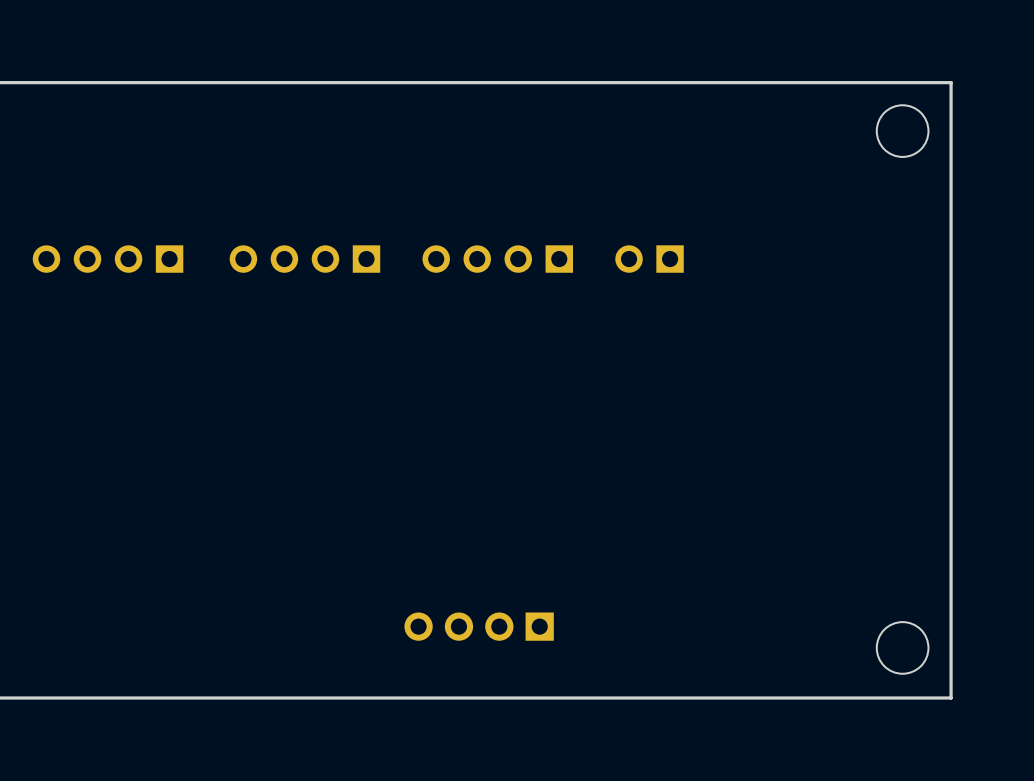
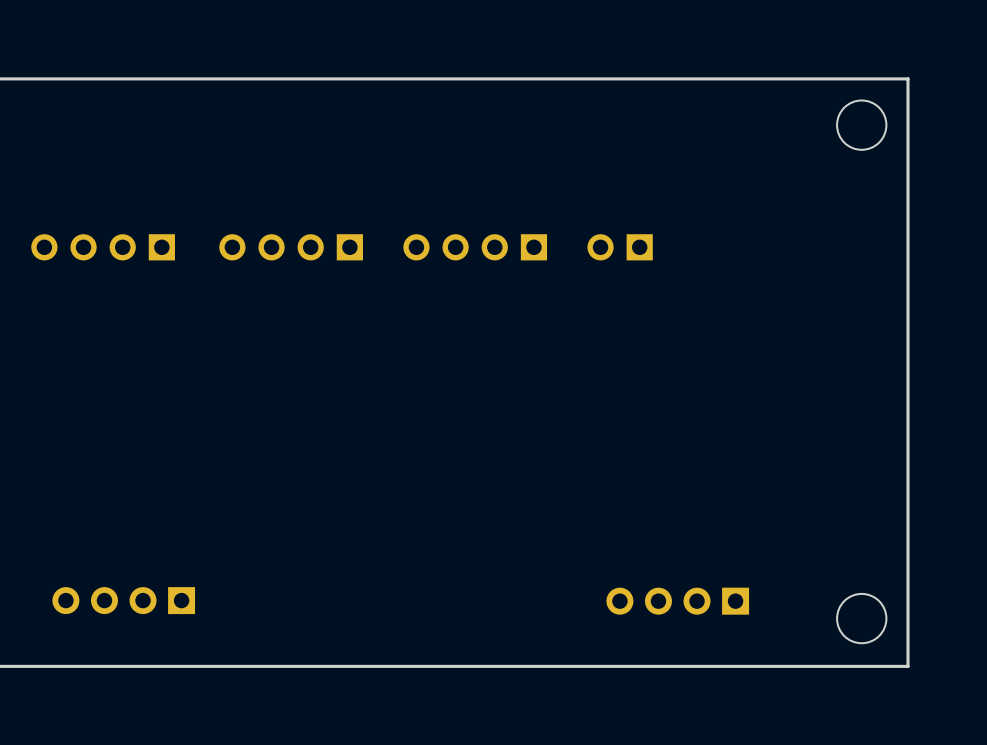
part: (479, 626) -> none
part: none -> (123, 600)
part: none -> (677, 601)

